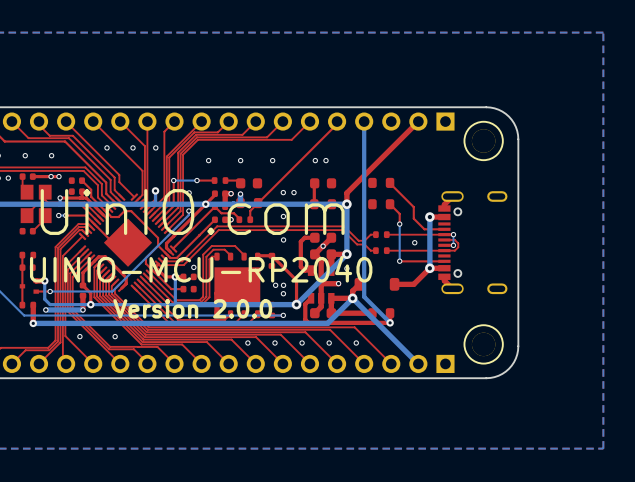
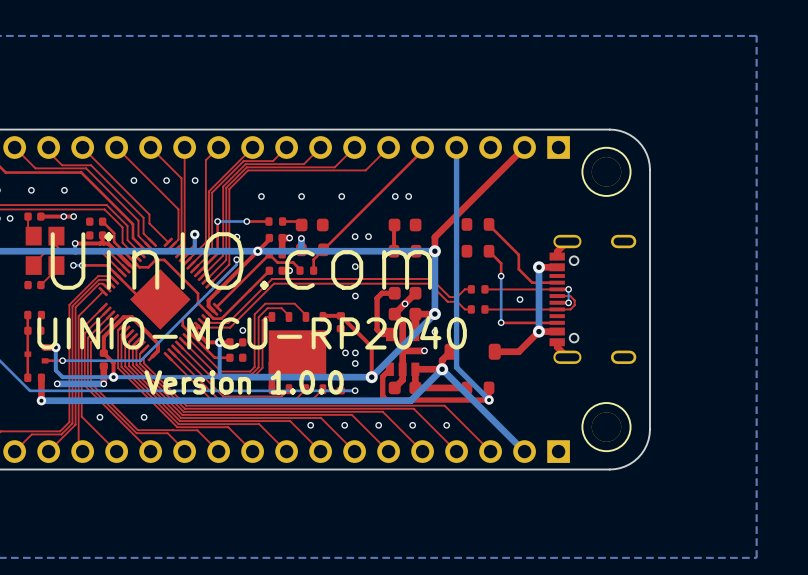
text: Version 2.0.0 (192, 308) -> Version 1.0.0 (244, 382)

